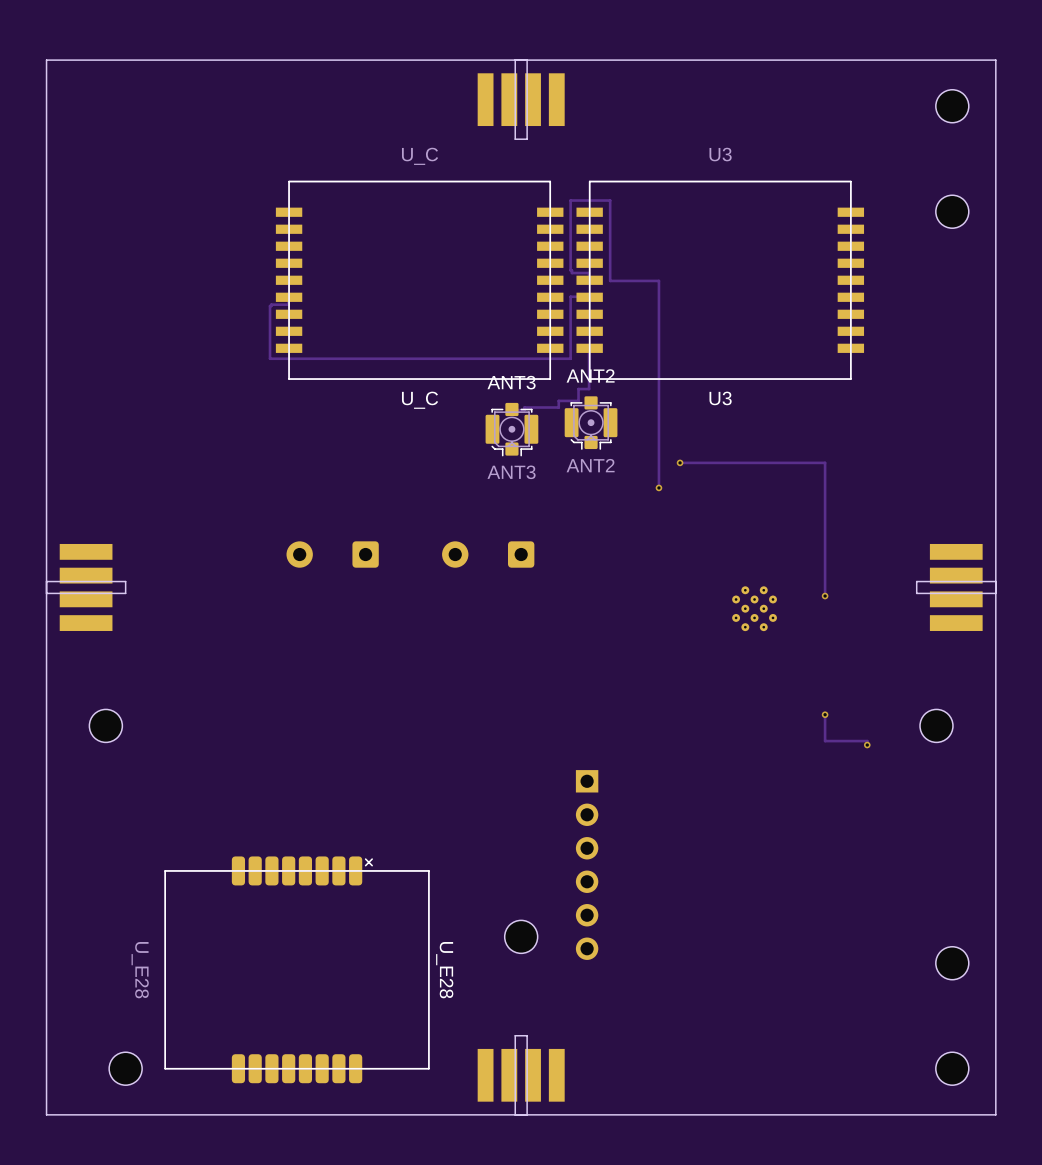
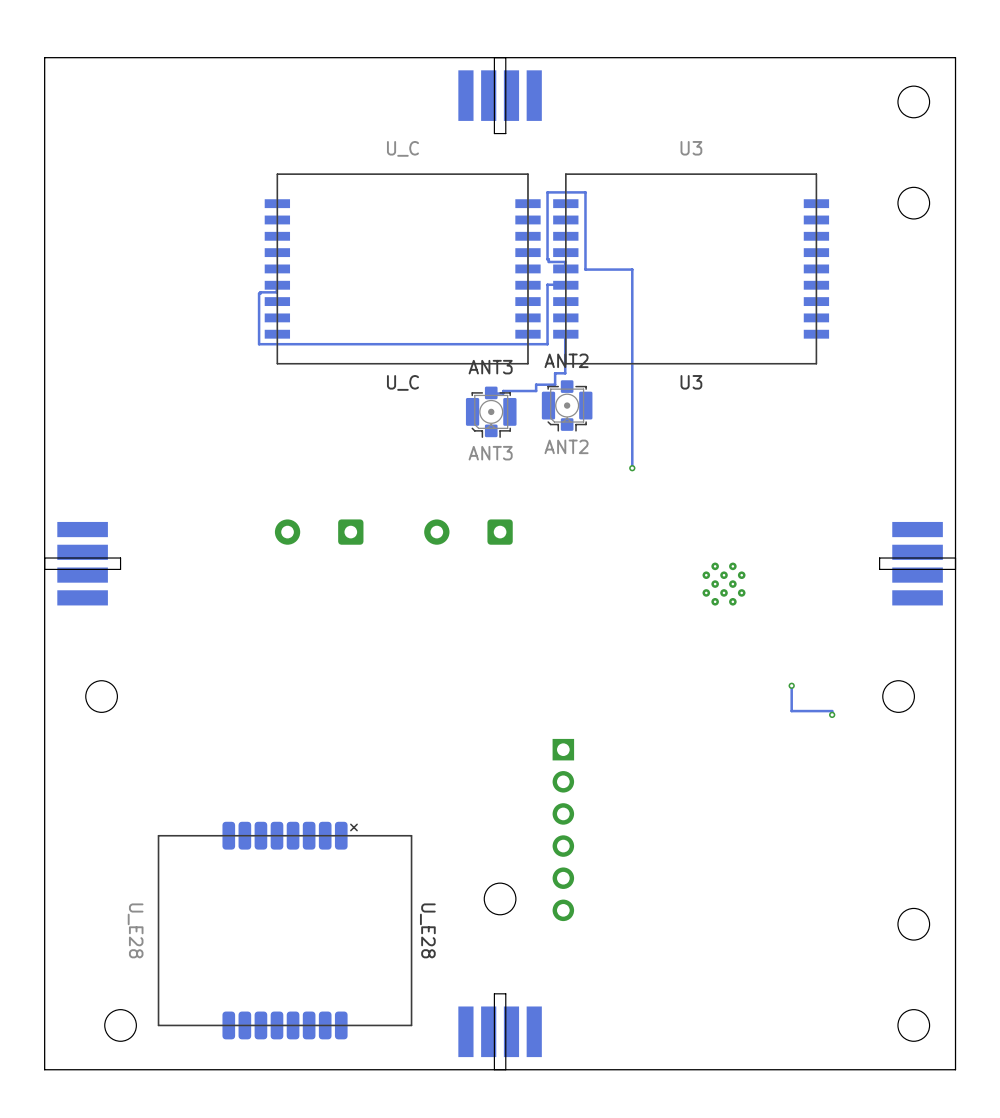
track: (680, 462) (825, 462) (825, 596) -> none
via: (680, 462) -> none
via: (825, 596) -> none

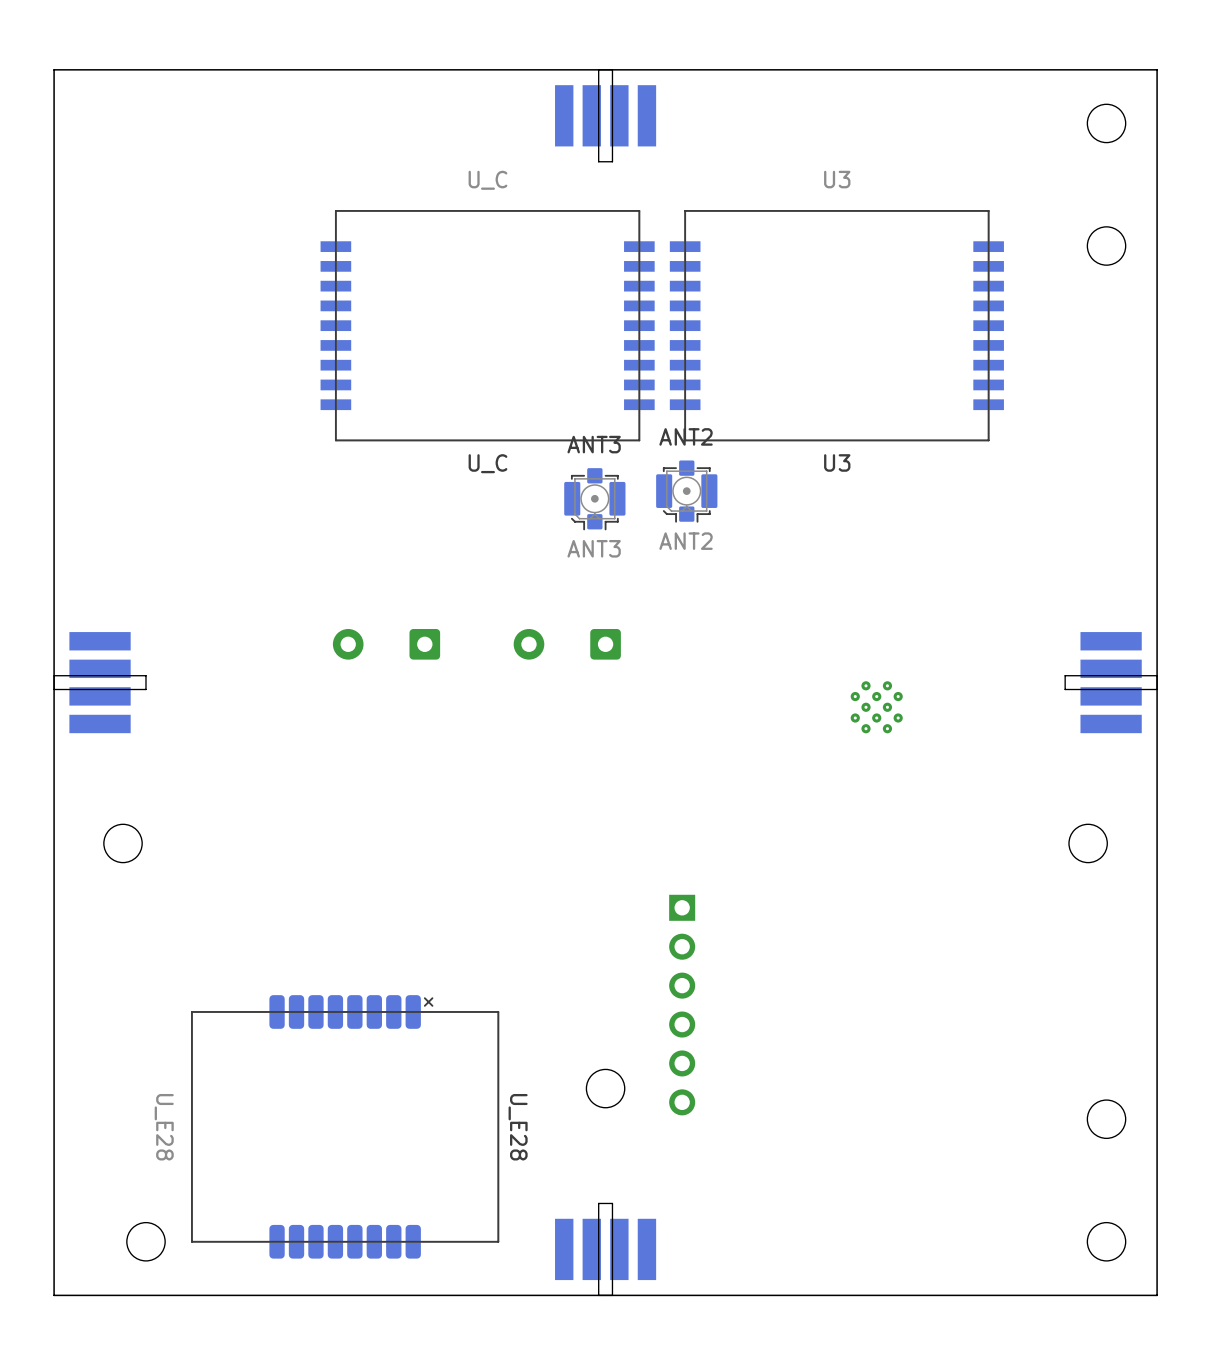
track: (565, 269) (565, 261) (548, 261) (547, 259) (547, 192) (585, 192) (585, 269) (632, 269) (632, 468) -> none
track: (565, 284) (547, 284) (547, 344) (259, 344) (259, 293) (276, 292) (276, 284) -> none
track: (565, 334) (565, 373) (555, 373) (555, 384) (536, 384) (536, 391) (503, 391) (503, 393) (490, 393) -> none
via: (632, 468) -> none
track: (791, 685) (791, 711) (832, 711) (832, 714) -> none
via: (791, 685) -> none
via: (832, 714) -> none

